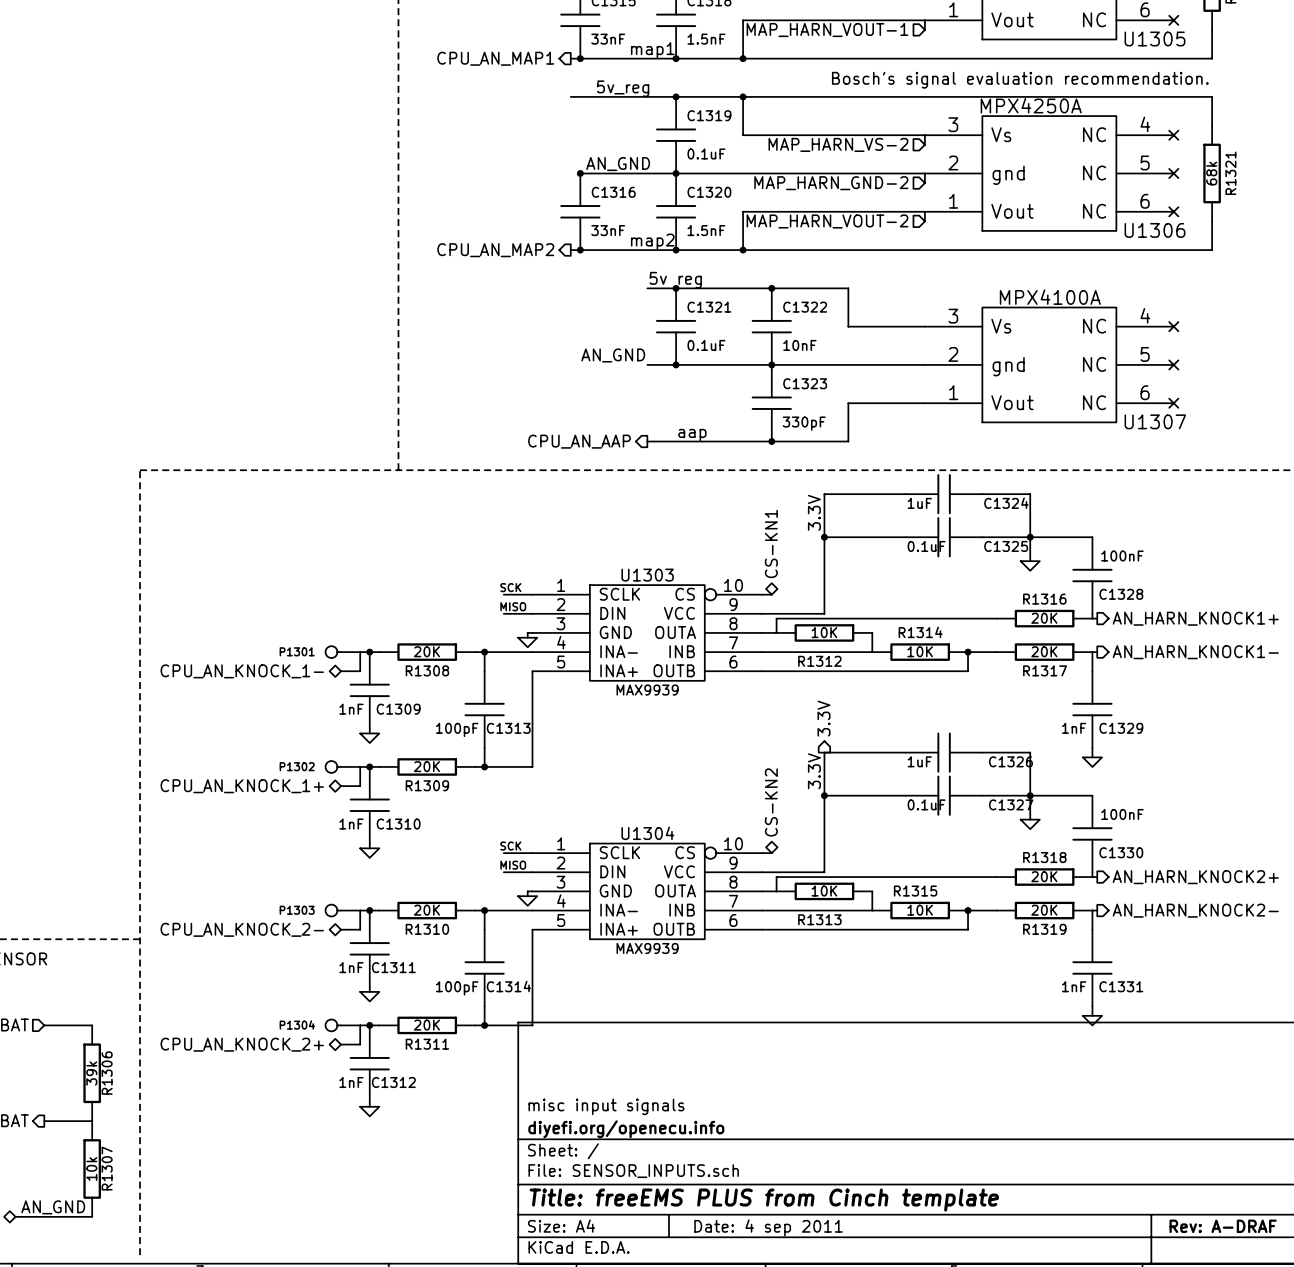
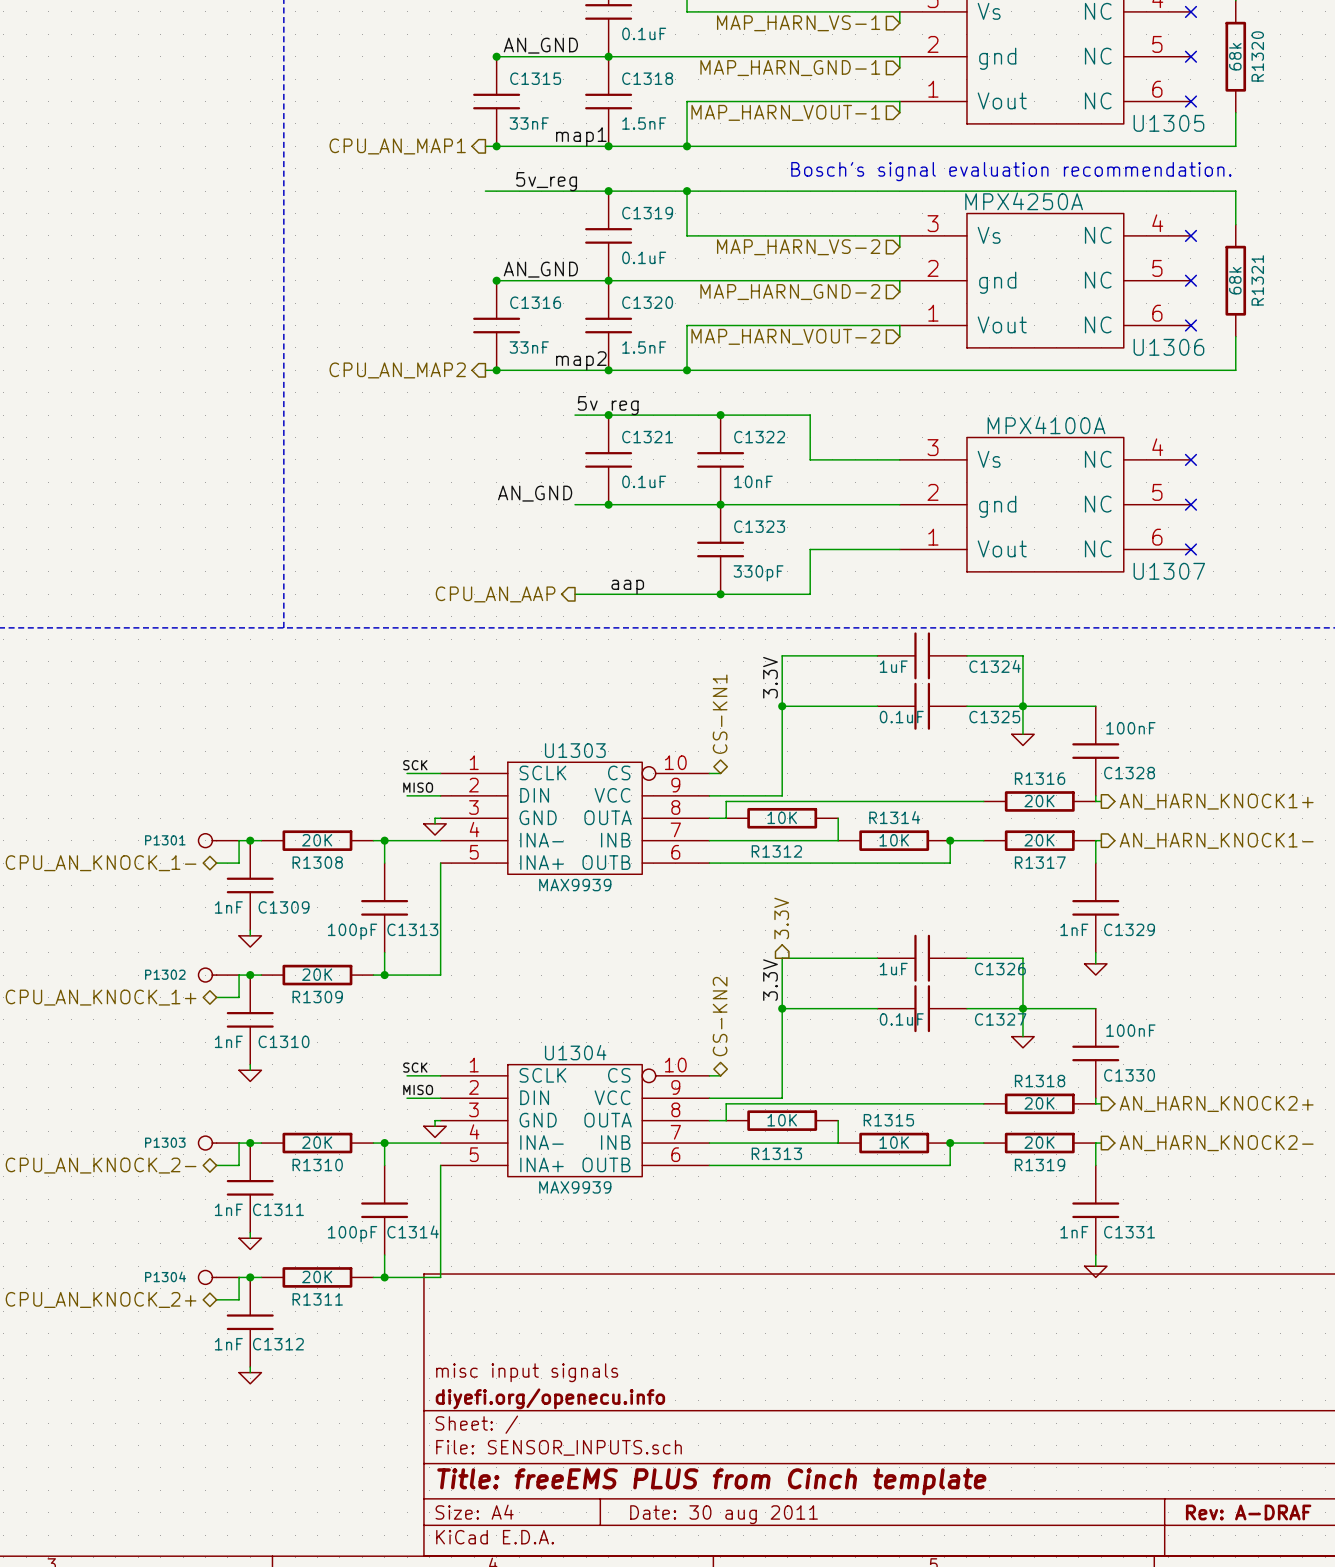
title block: Date: 4 sep 2011 (768, 1227) -> Date: 30 aug 2011 (724, 1514)

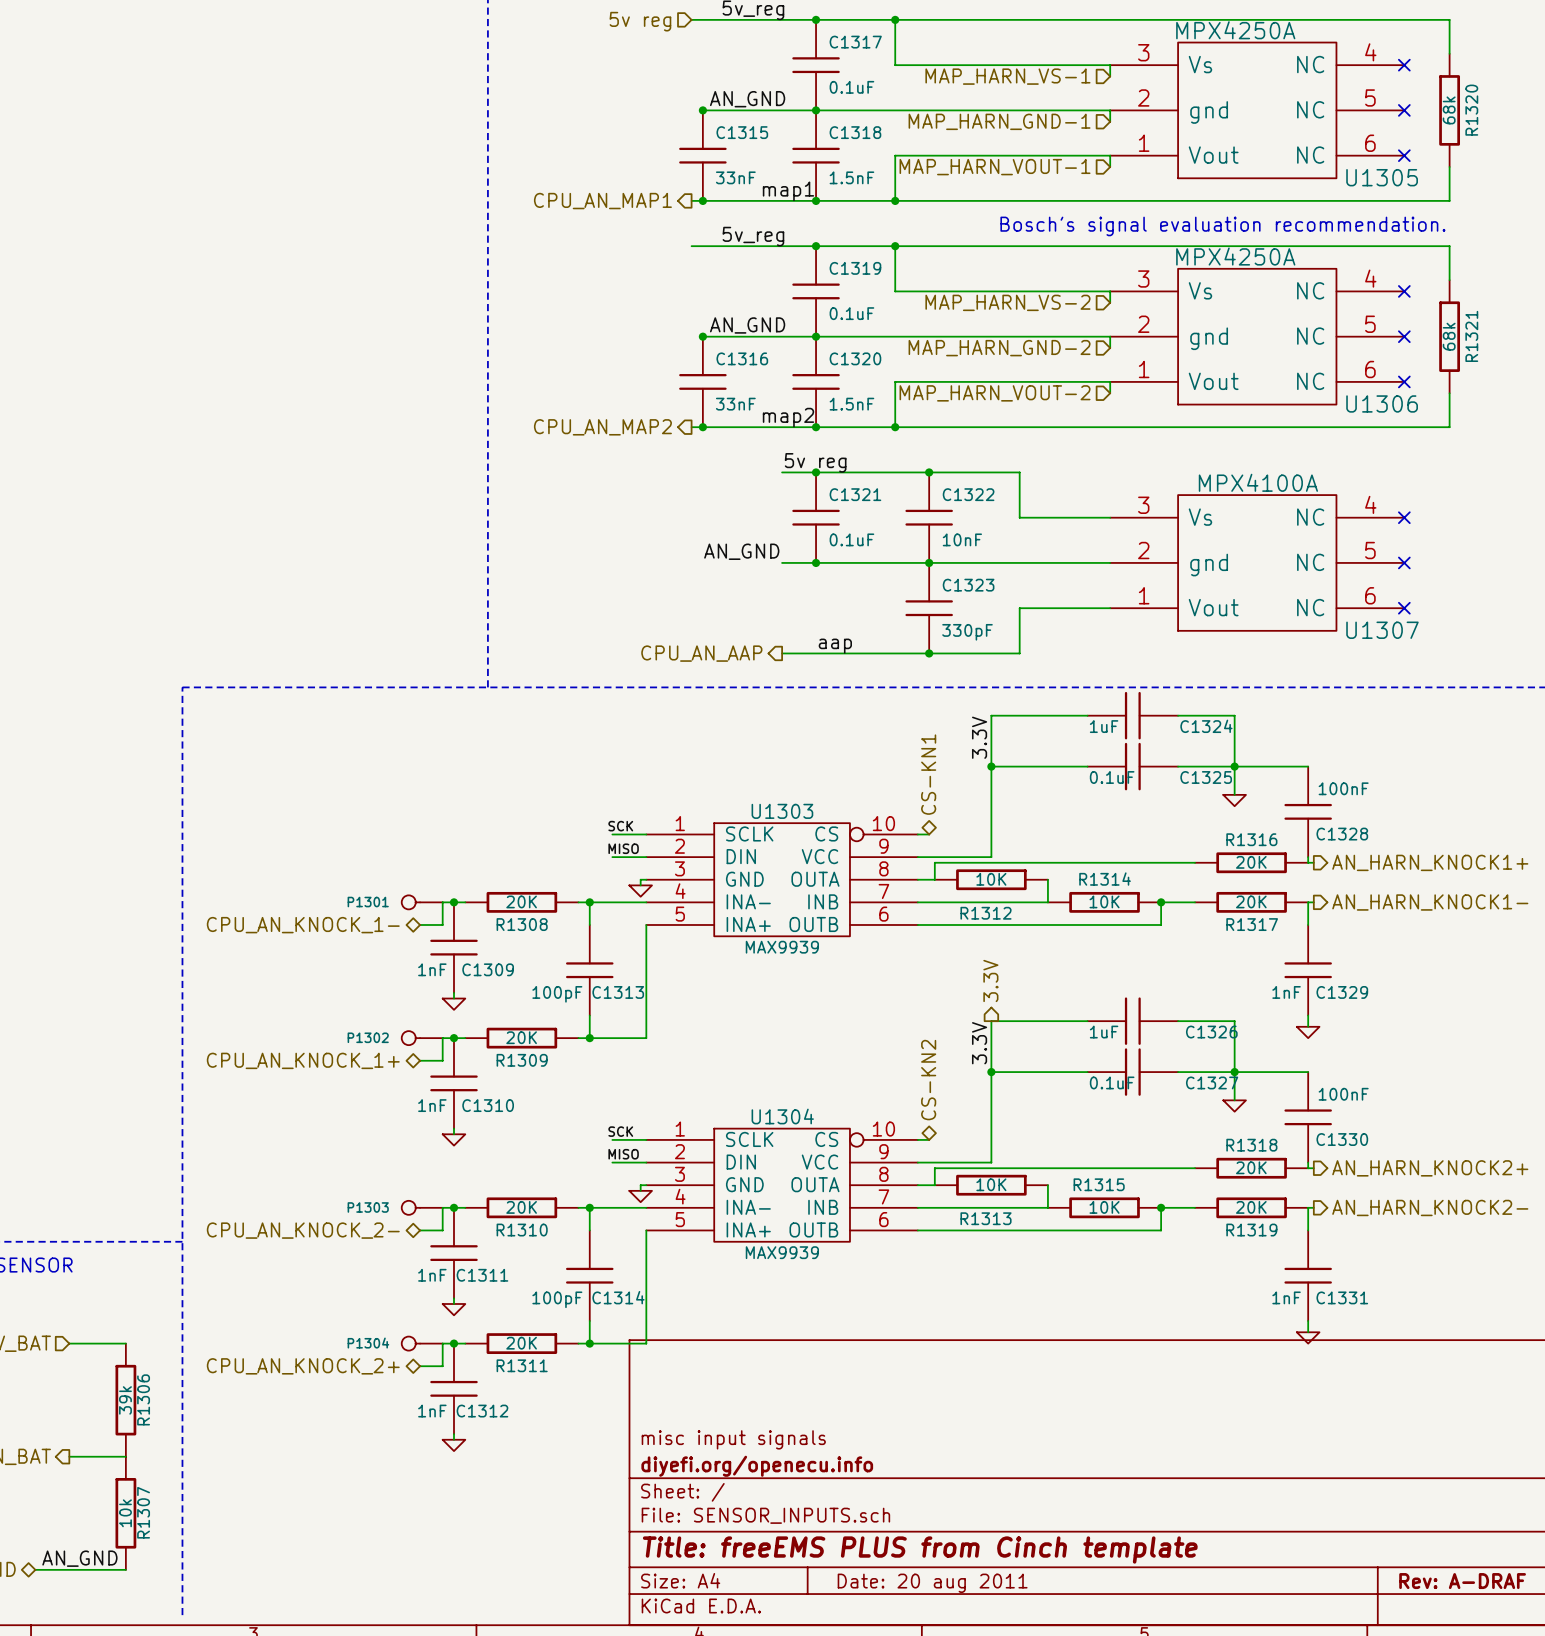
title block: Date: 30 aug 2011 (724, 1514) -> Date: 20 aug 2011 (932, 1583)

